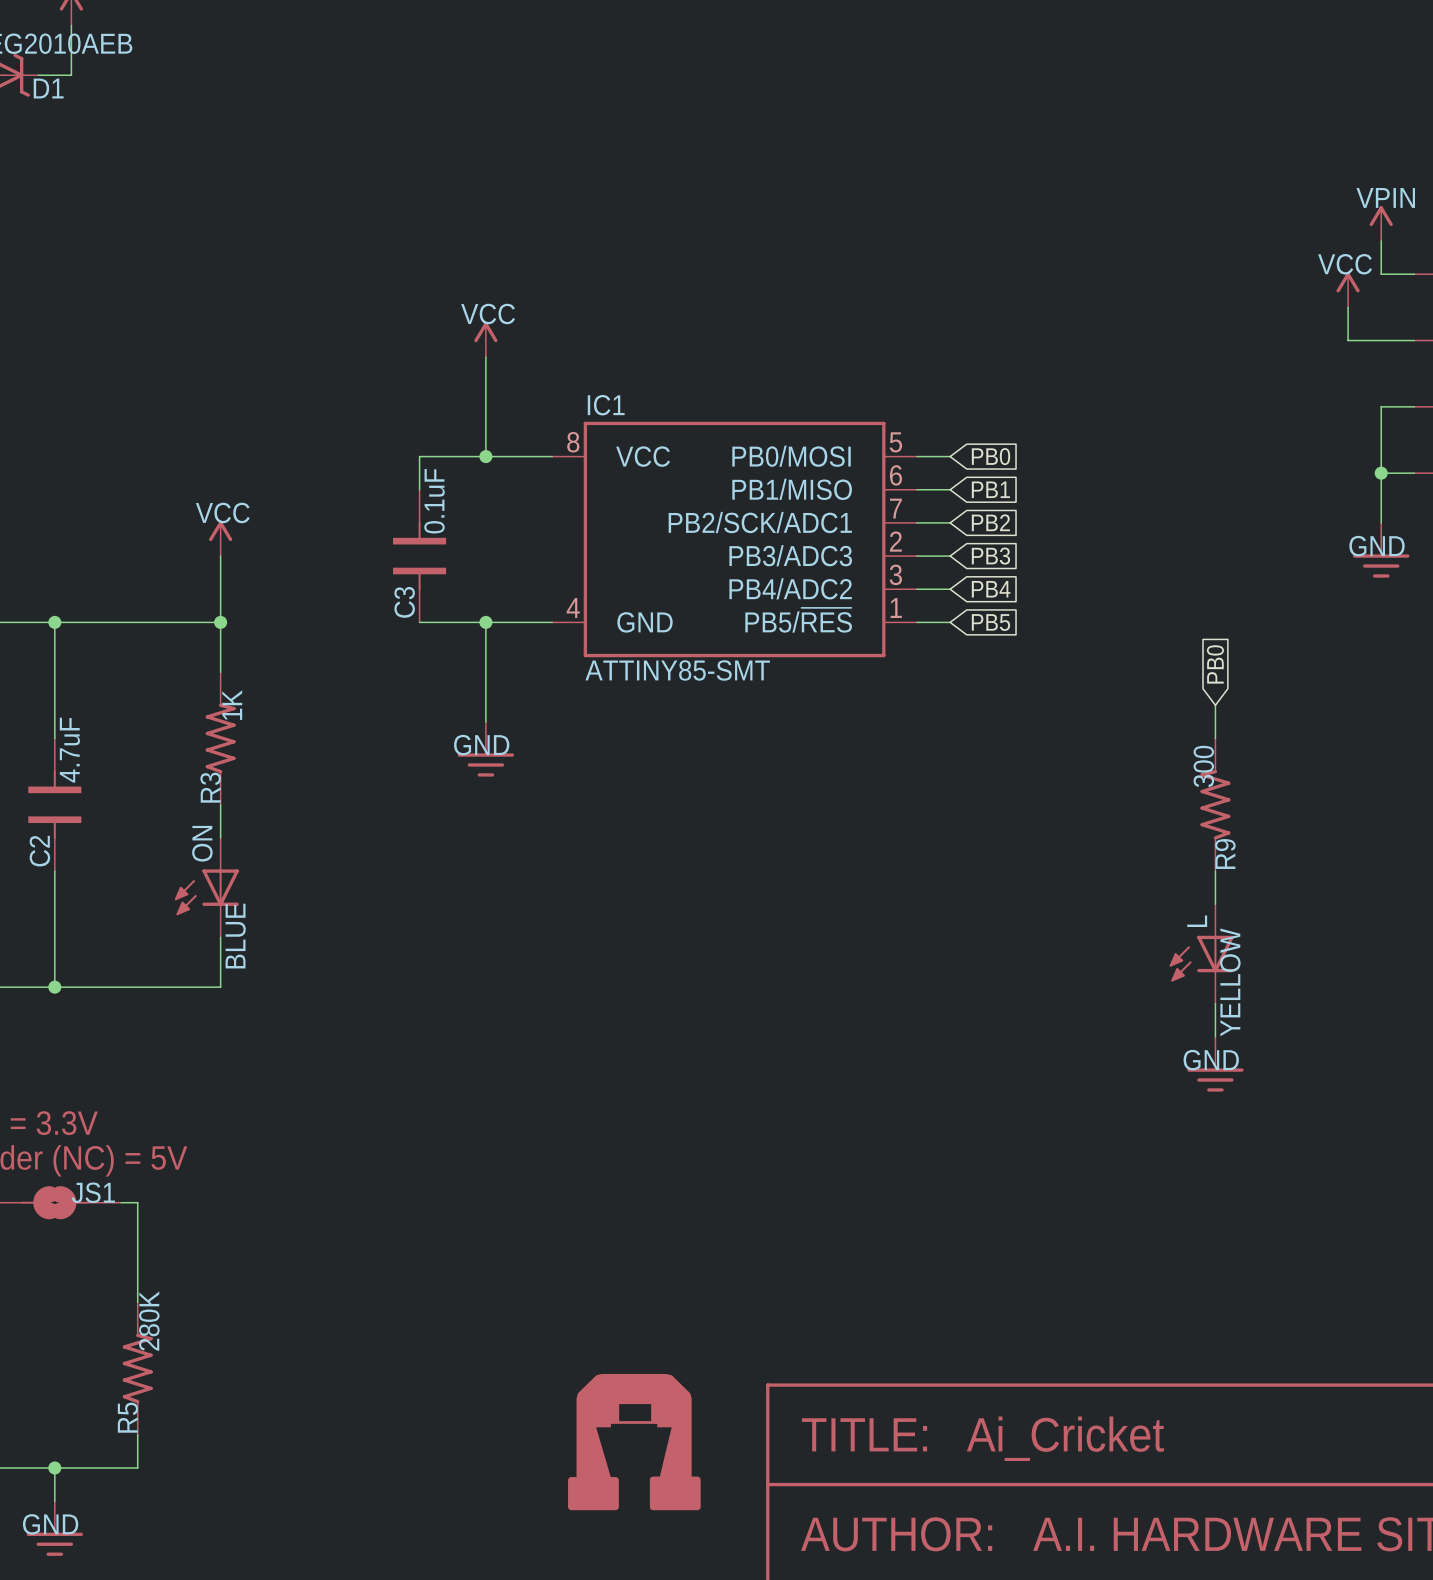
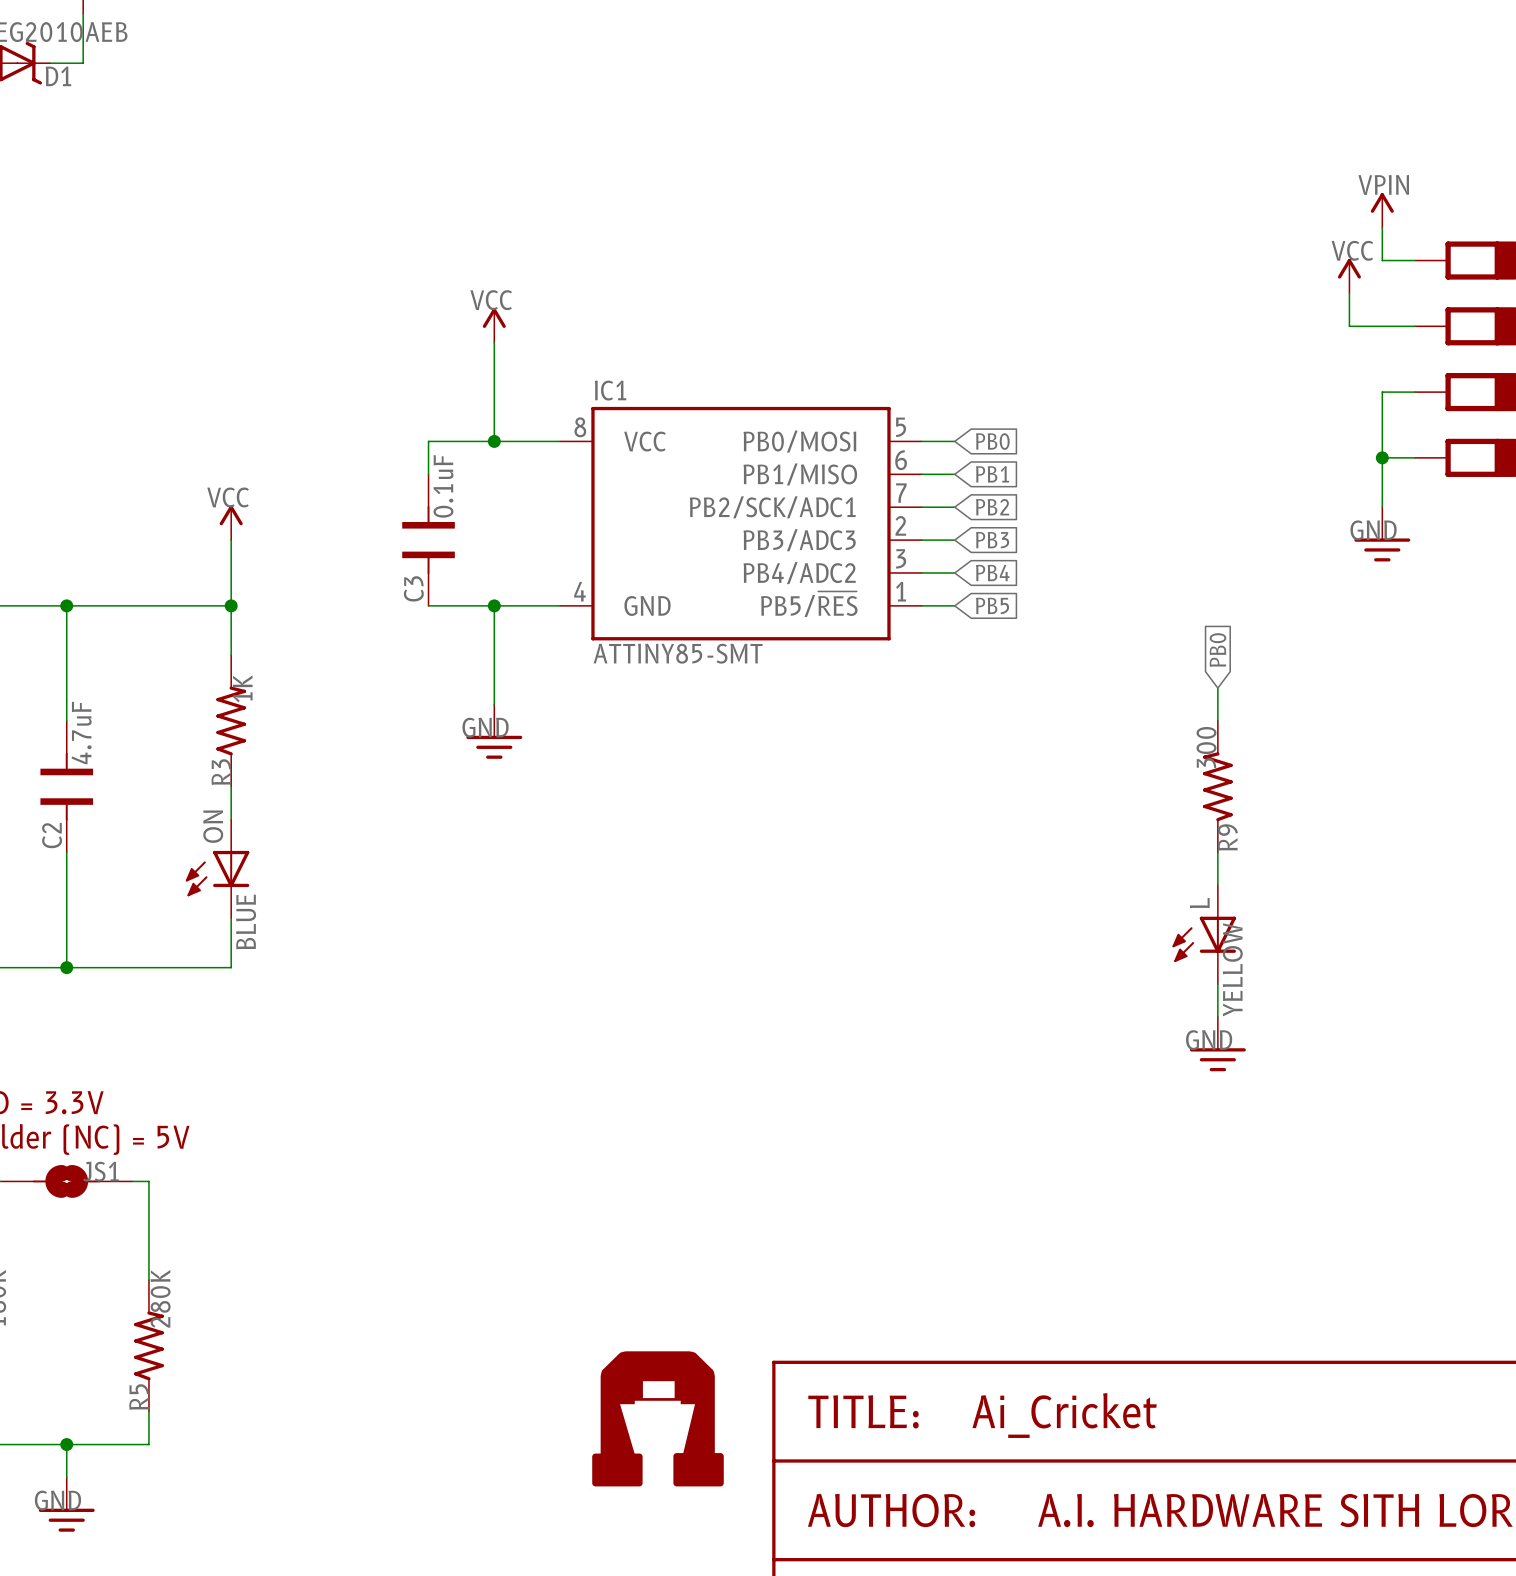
part position: (634, 1442) -> (657, 1418)

